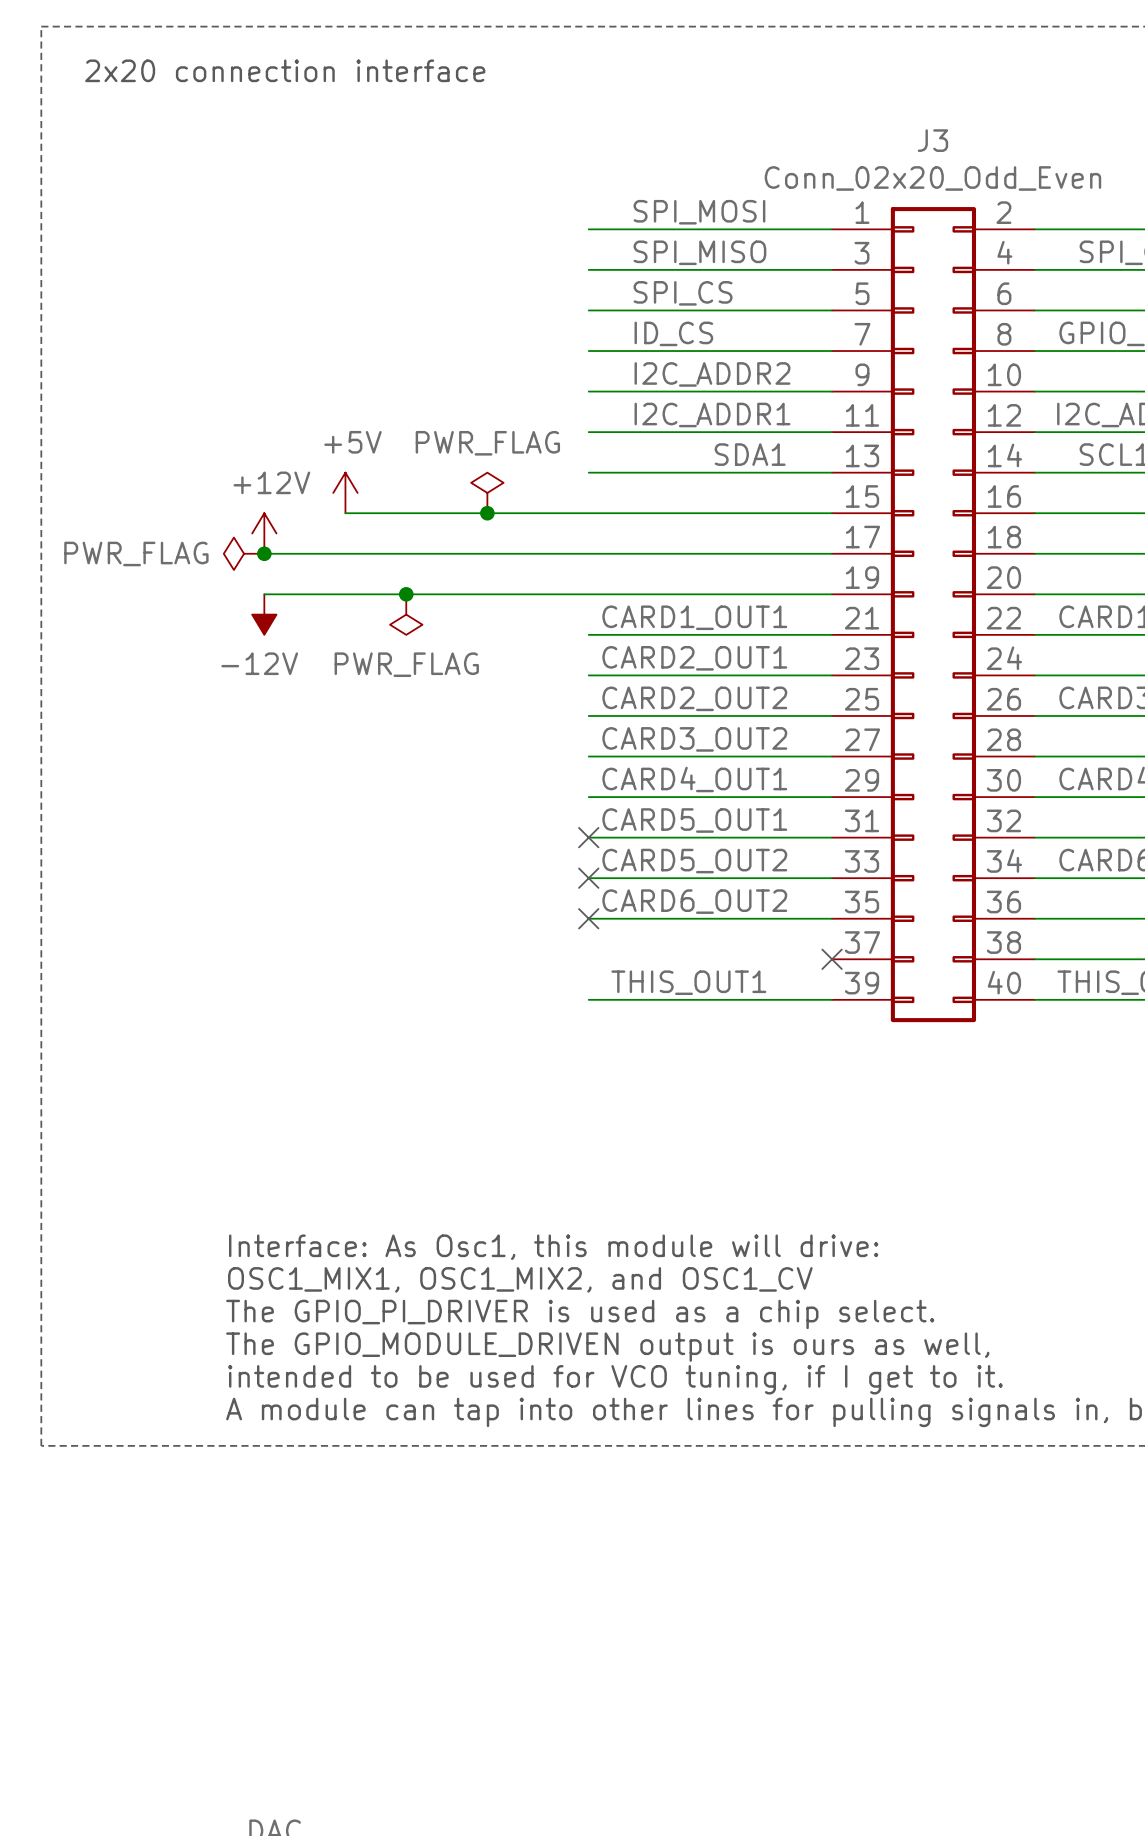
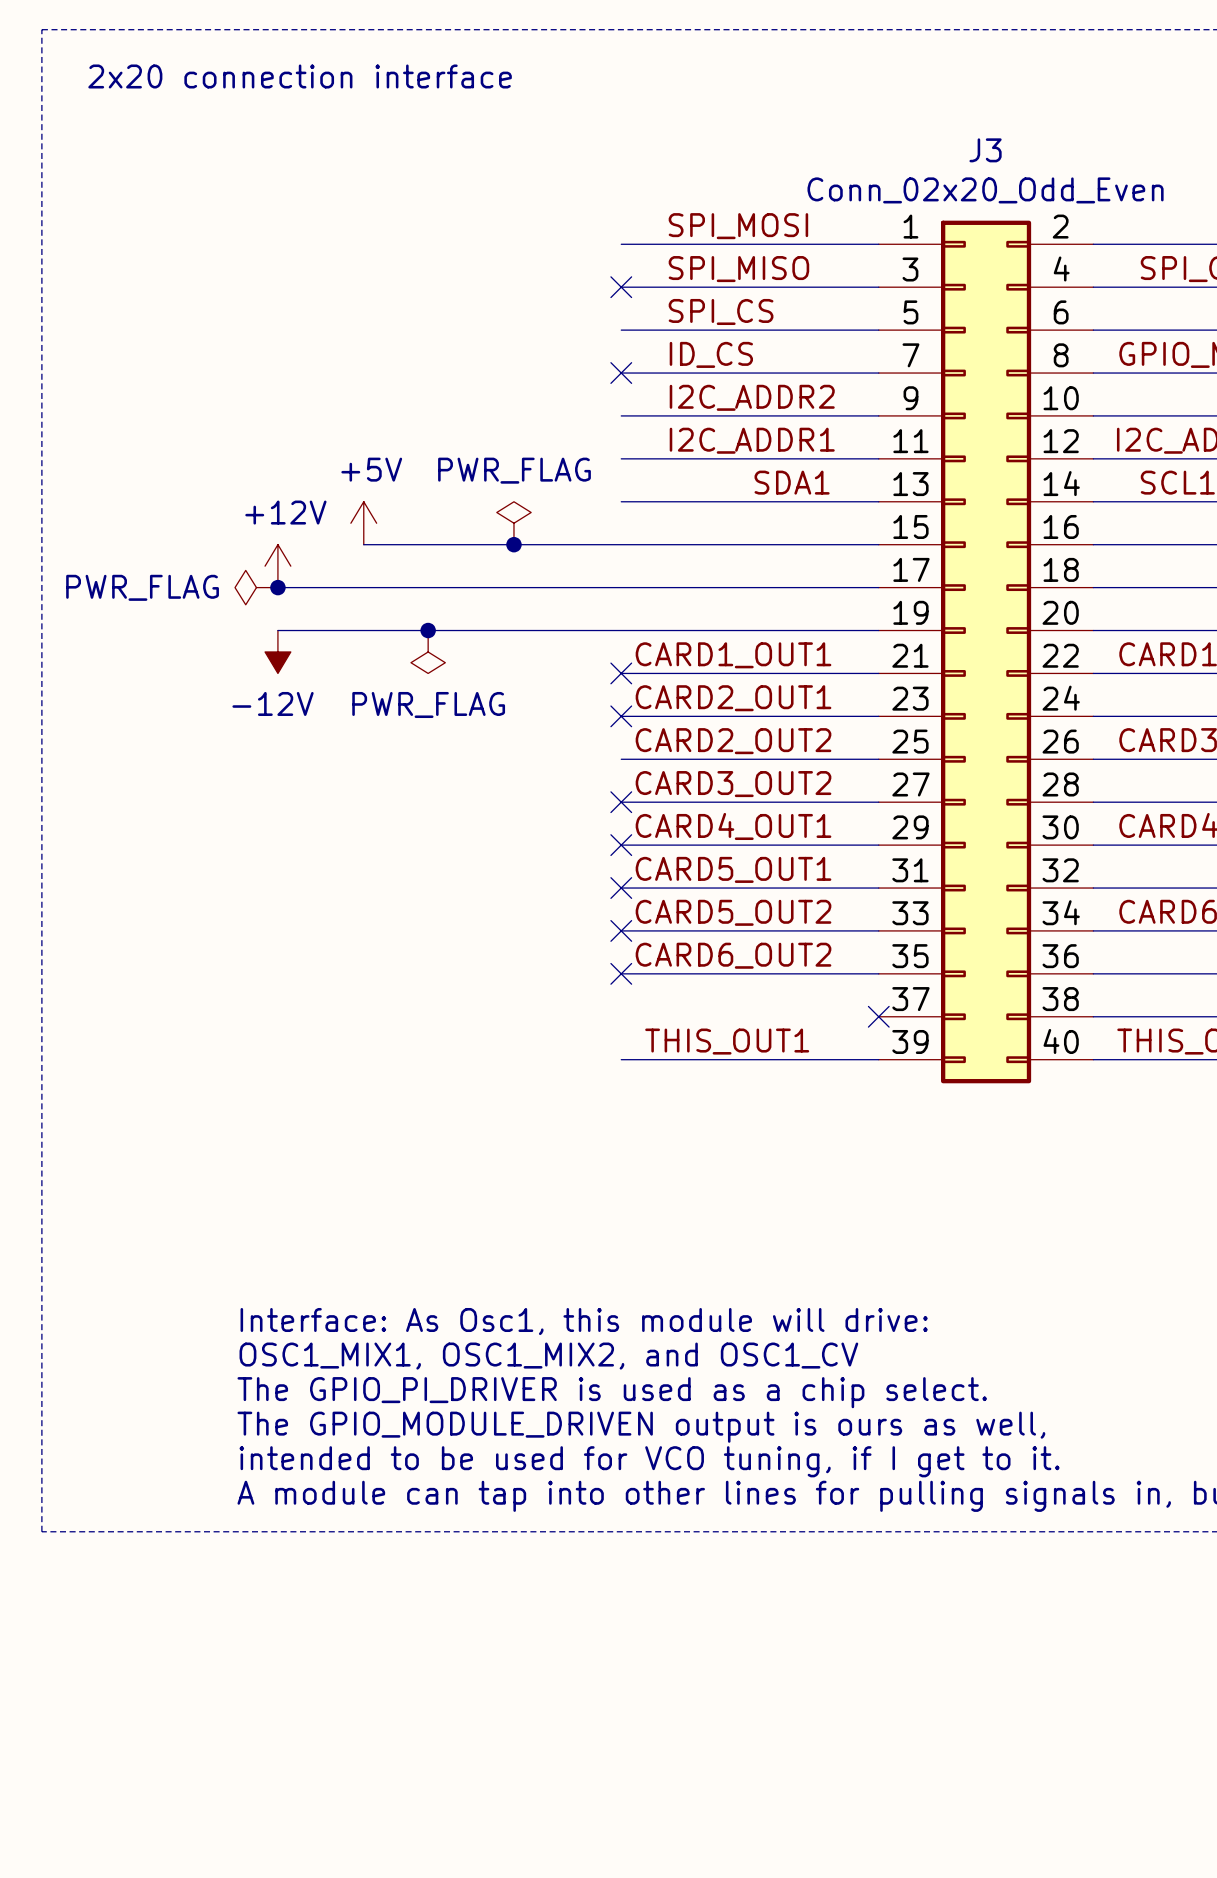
no-connect mark: none -> (621, 287)
no-connect mark: none -> (621, 373)
no-connect mark: none -> (621, 673)
no-connect mark: none -> (621, 716)
no-connect mark: none -> (621, 802)
no-connect mark: none -> (621, 845)

